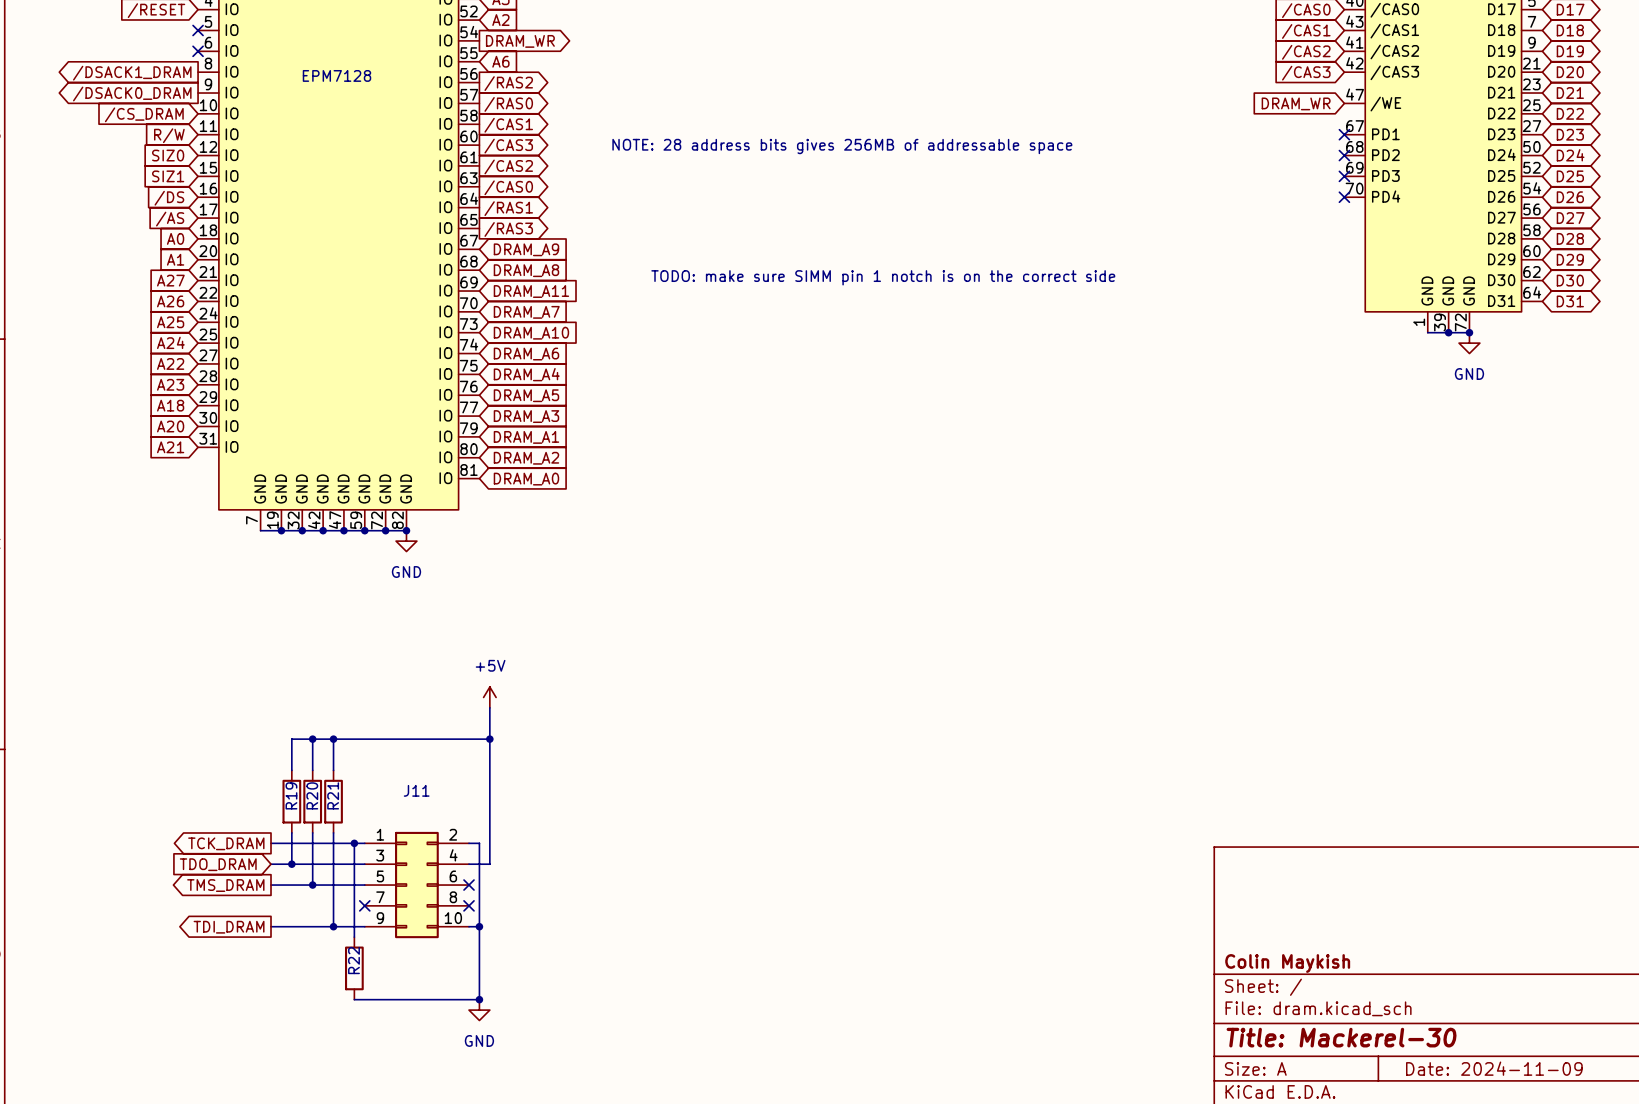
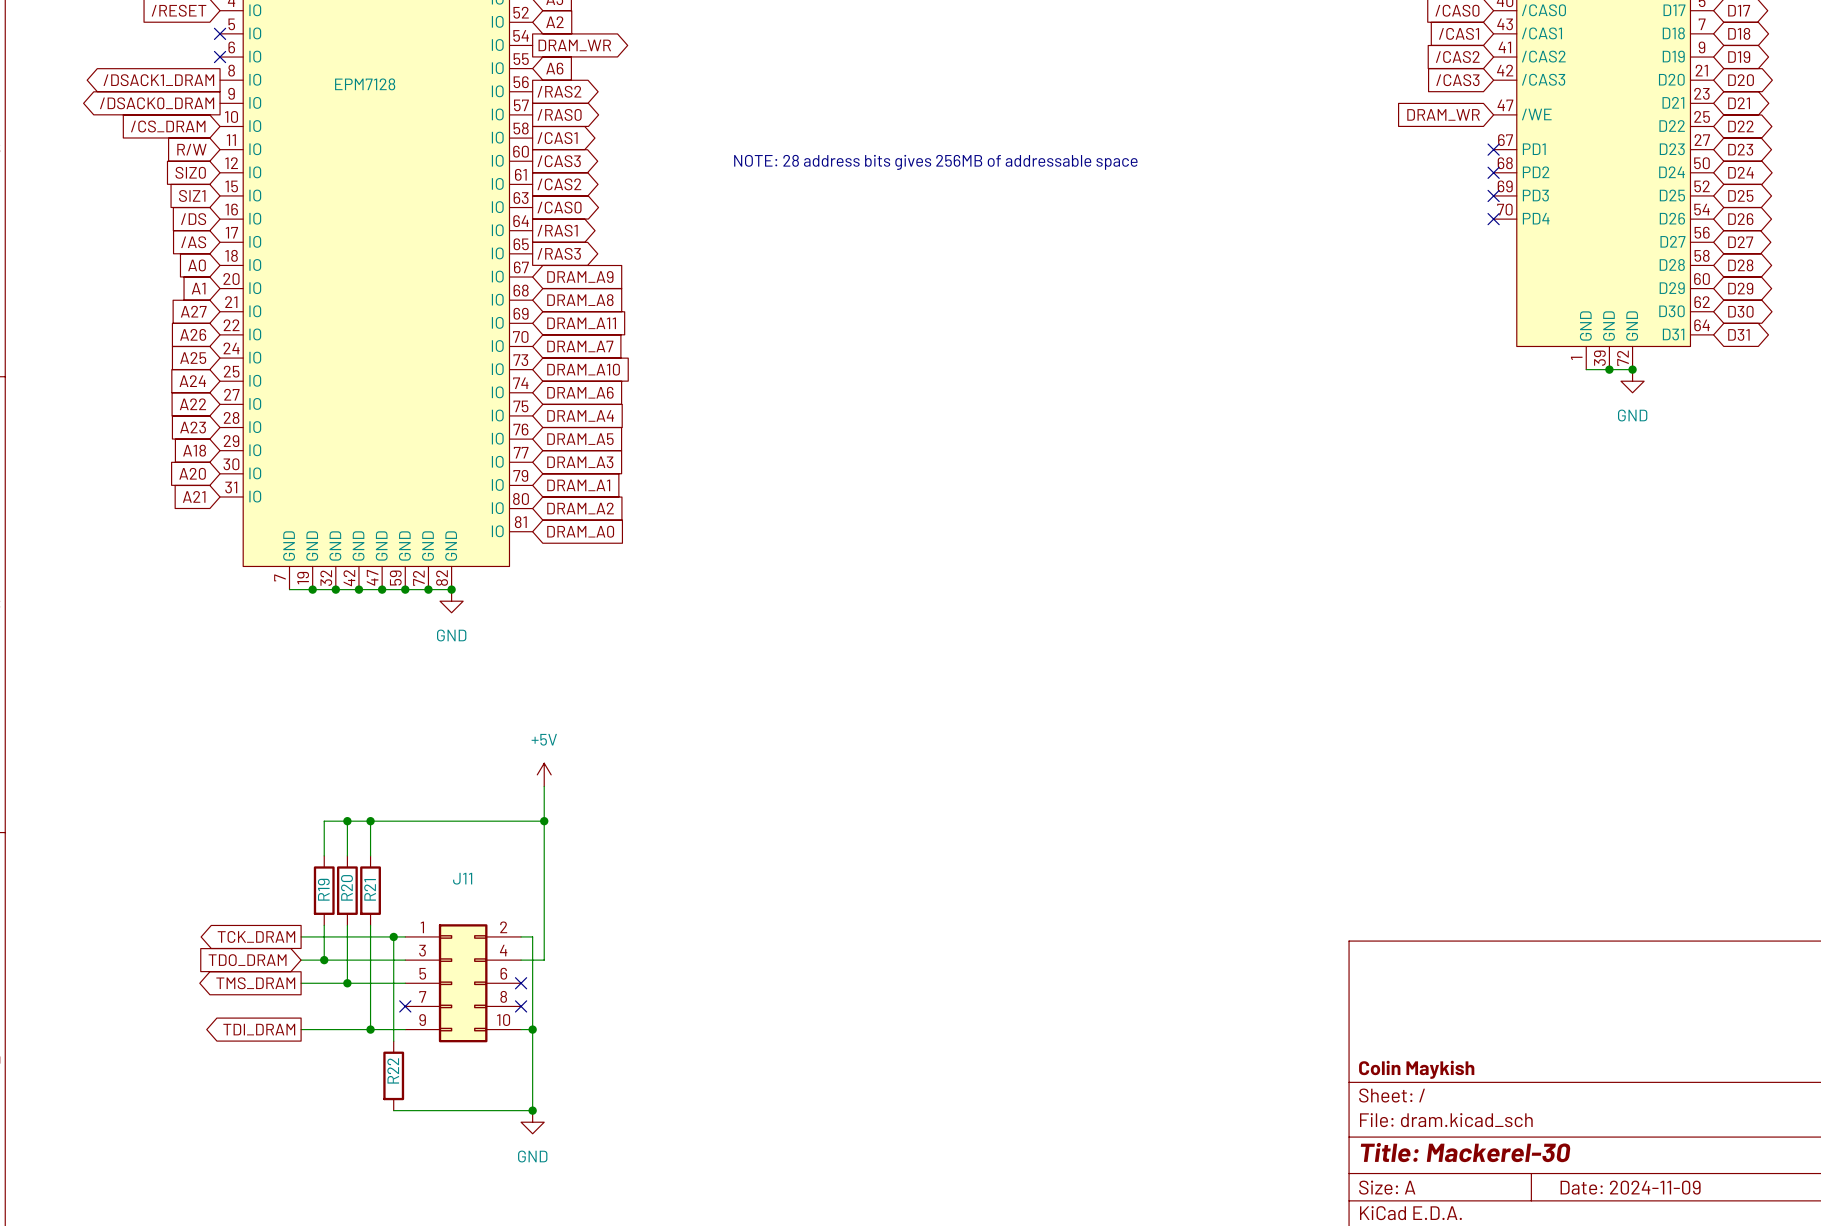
text: TODO: make sure SIMM pin 1 notch is on the correct side (883, 277) -> none

